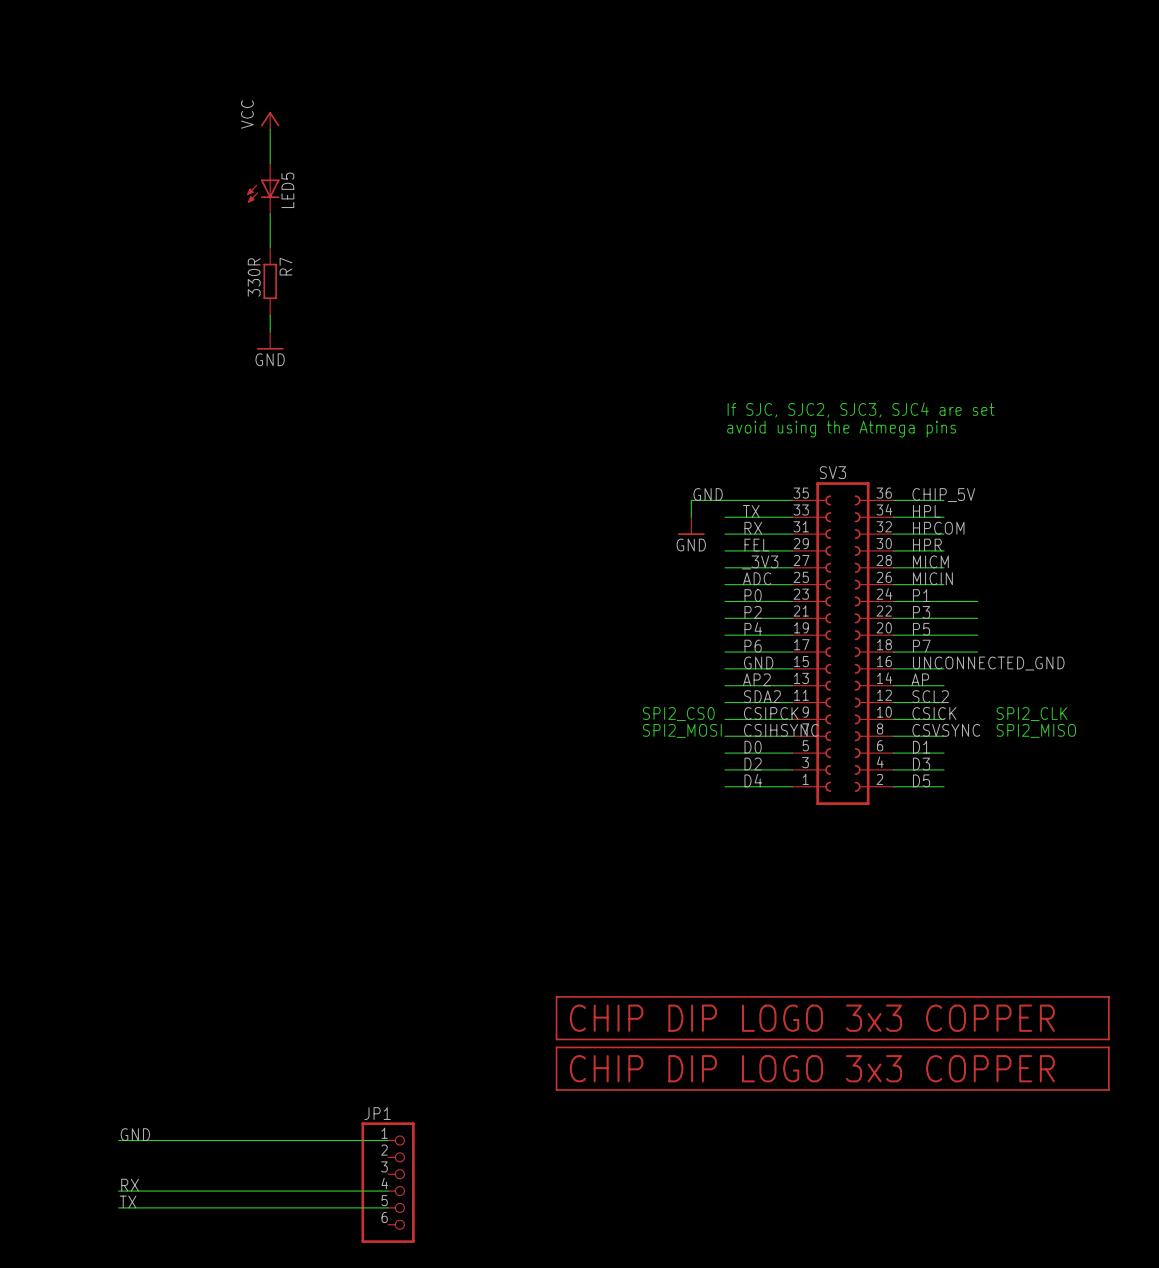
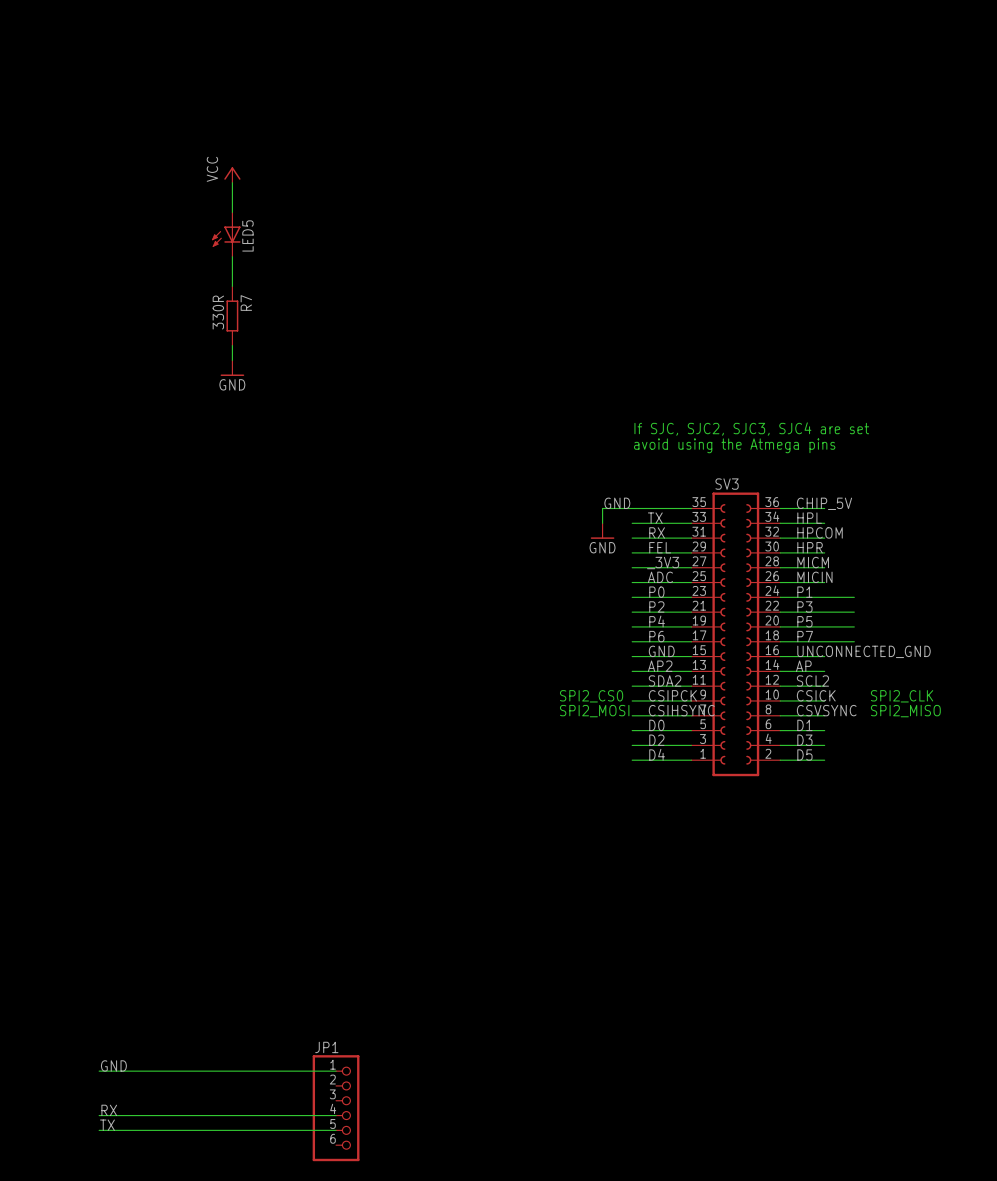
part: (832, 1018) -> none
part: (832, 1068) -> none

